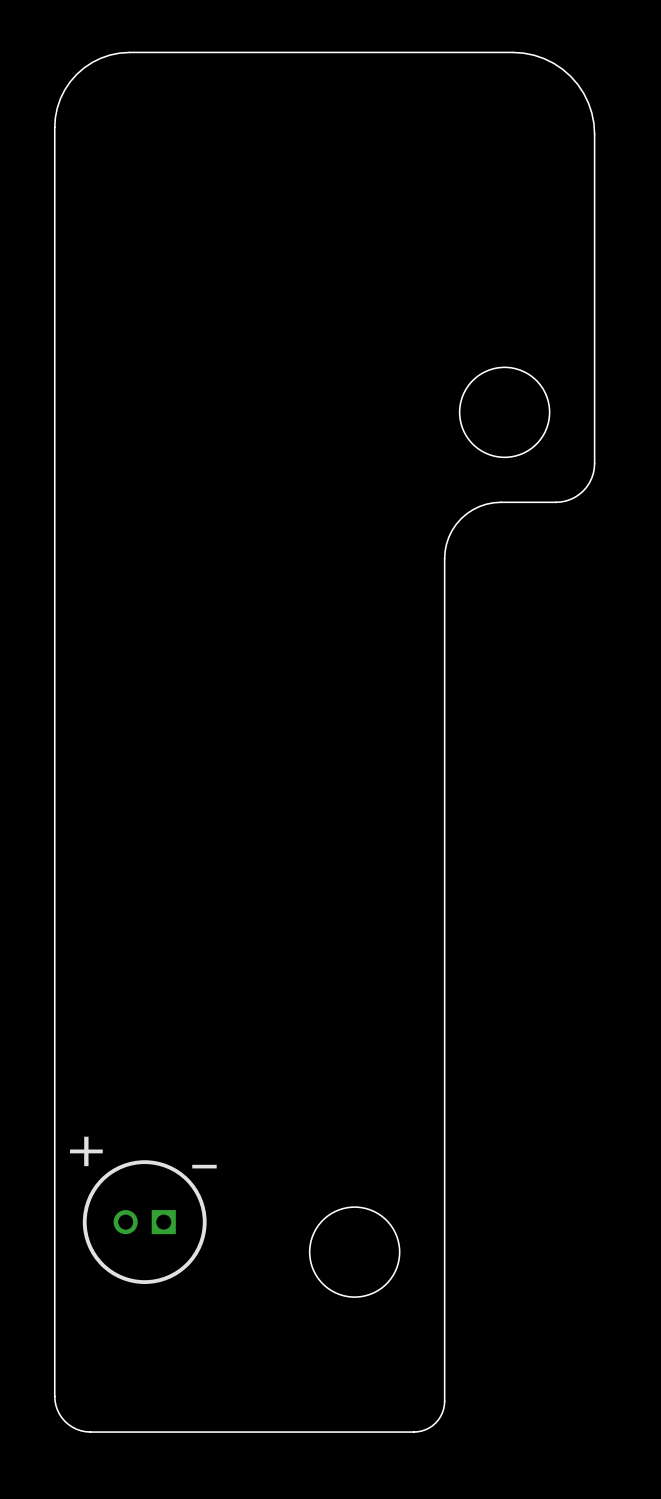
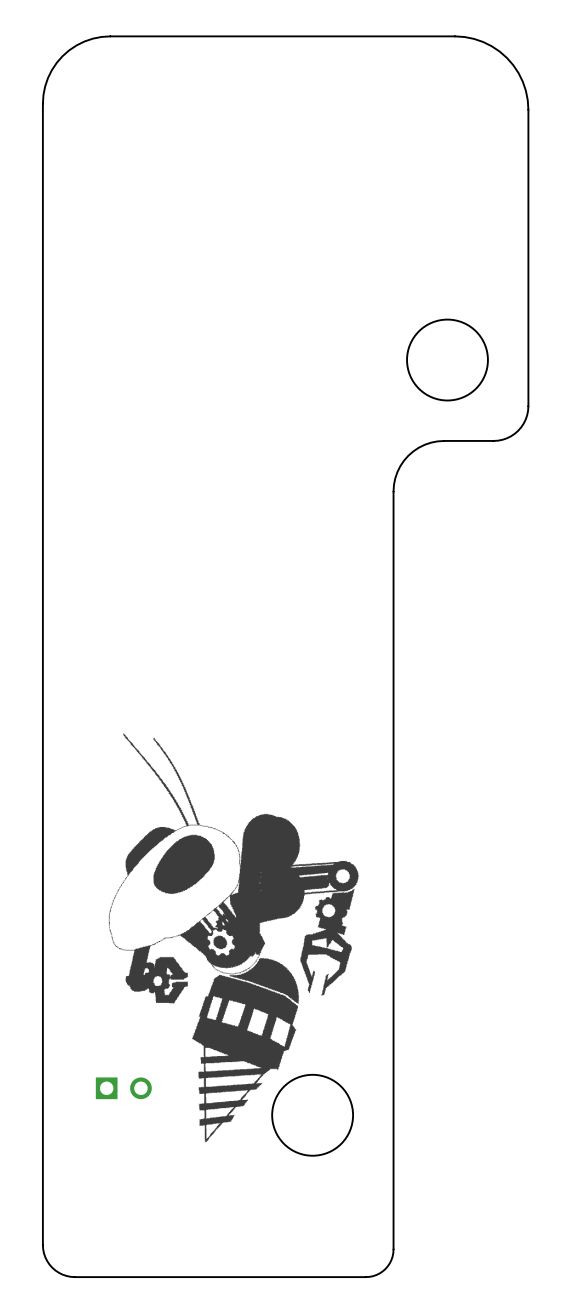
drawing: none -> [108, 733, 359, 1143]
text: + (86, 1151) -> none
text: _ (204, 1166) -> none
part side: top (144, 1222) -> bottom (123, 1088)

